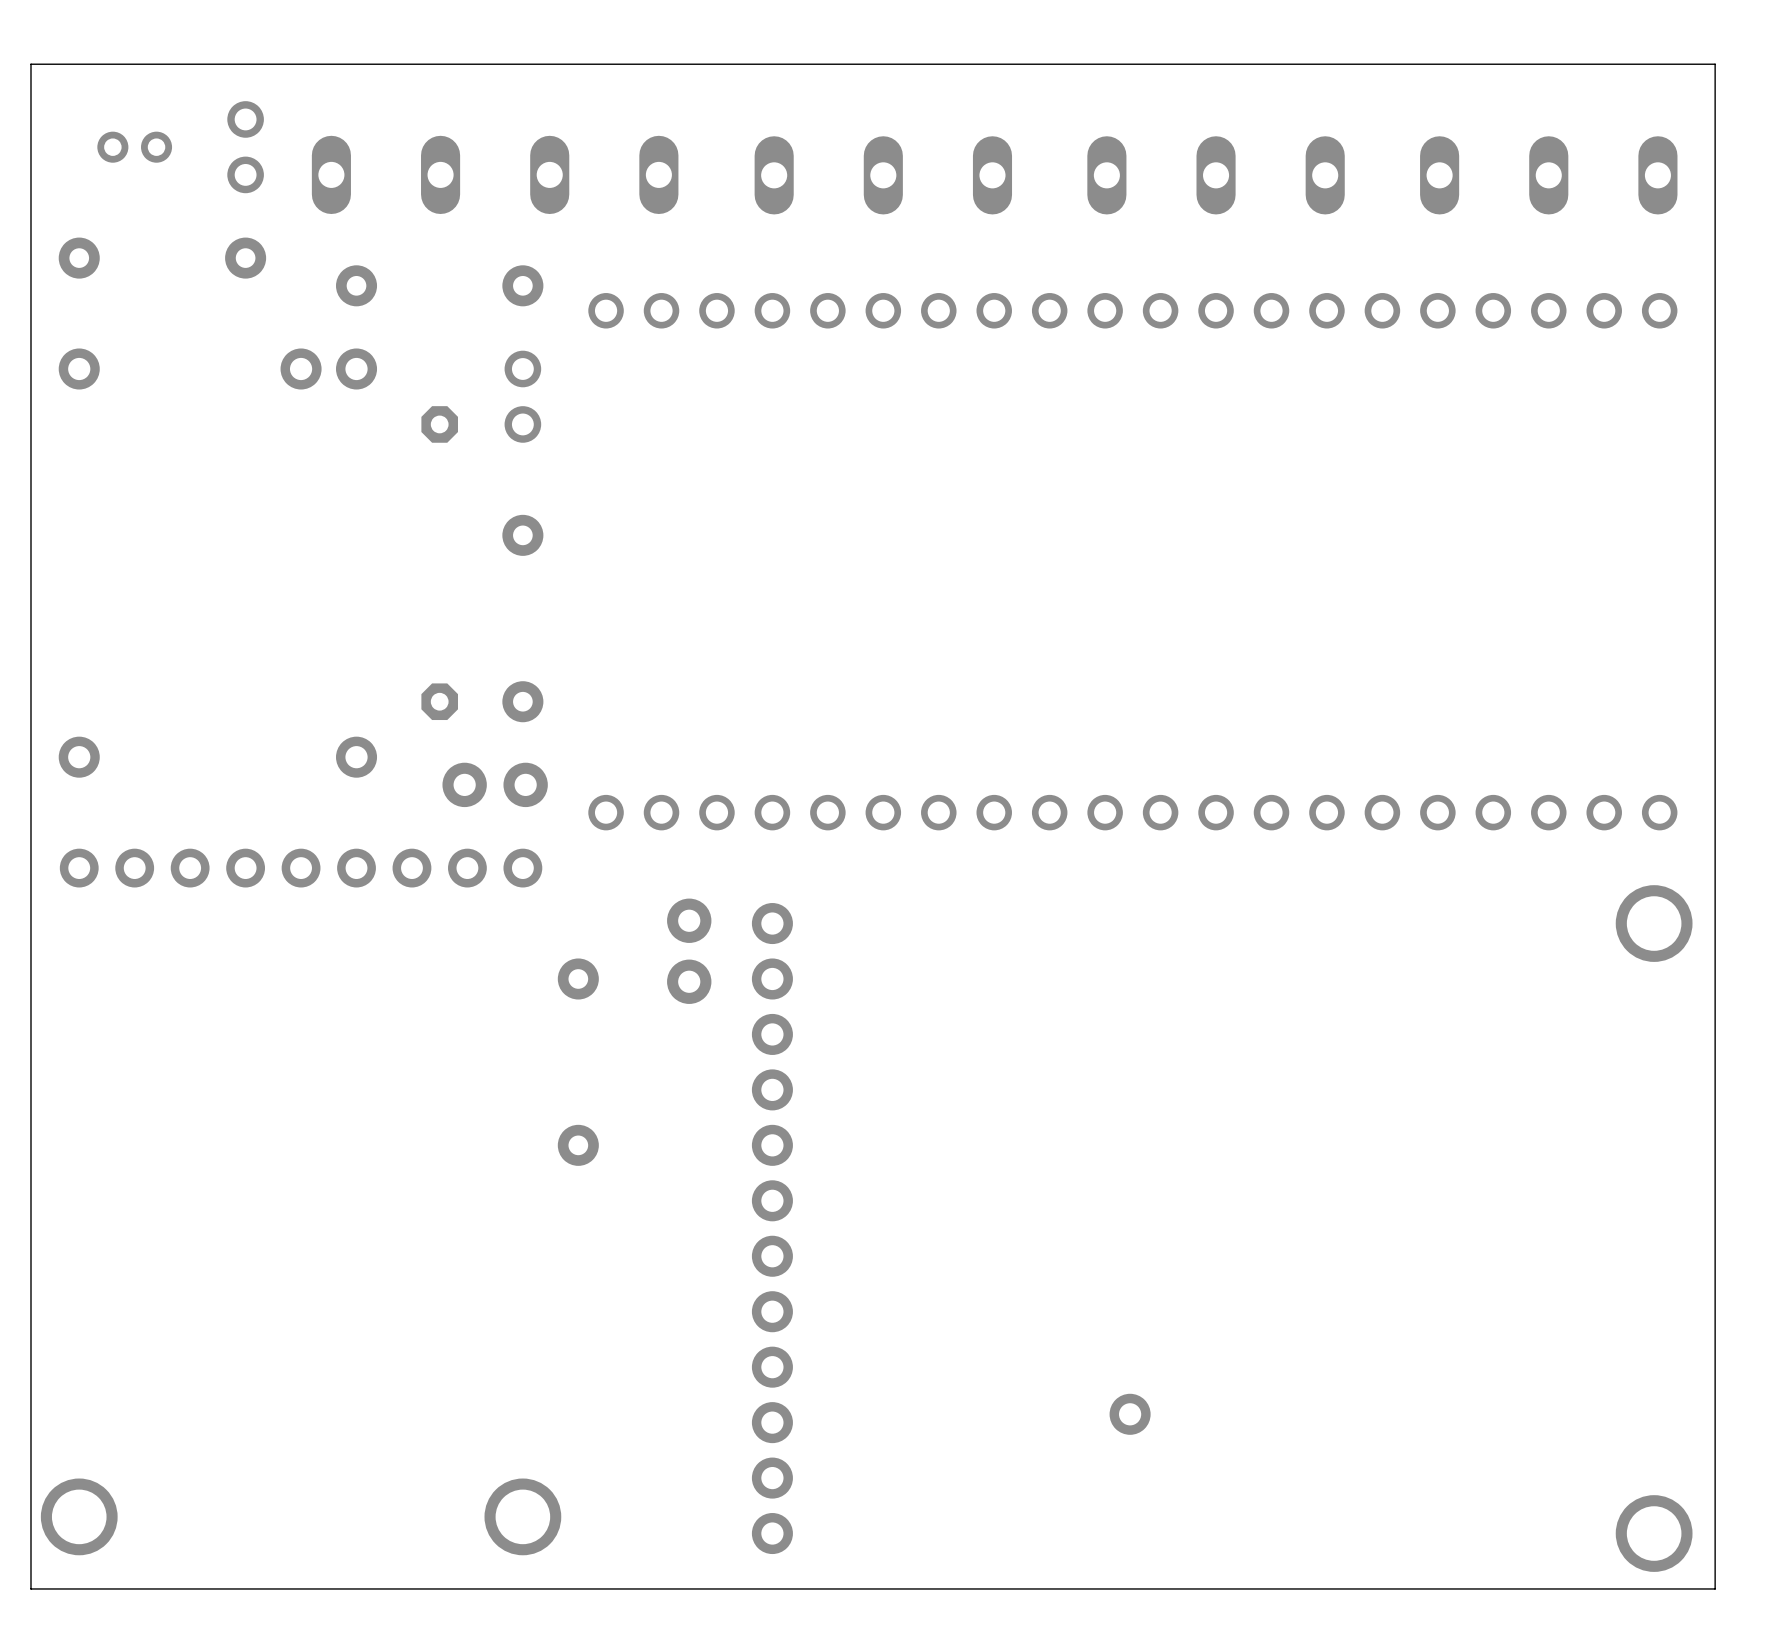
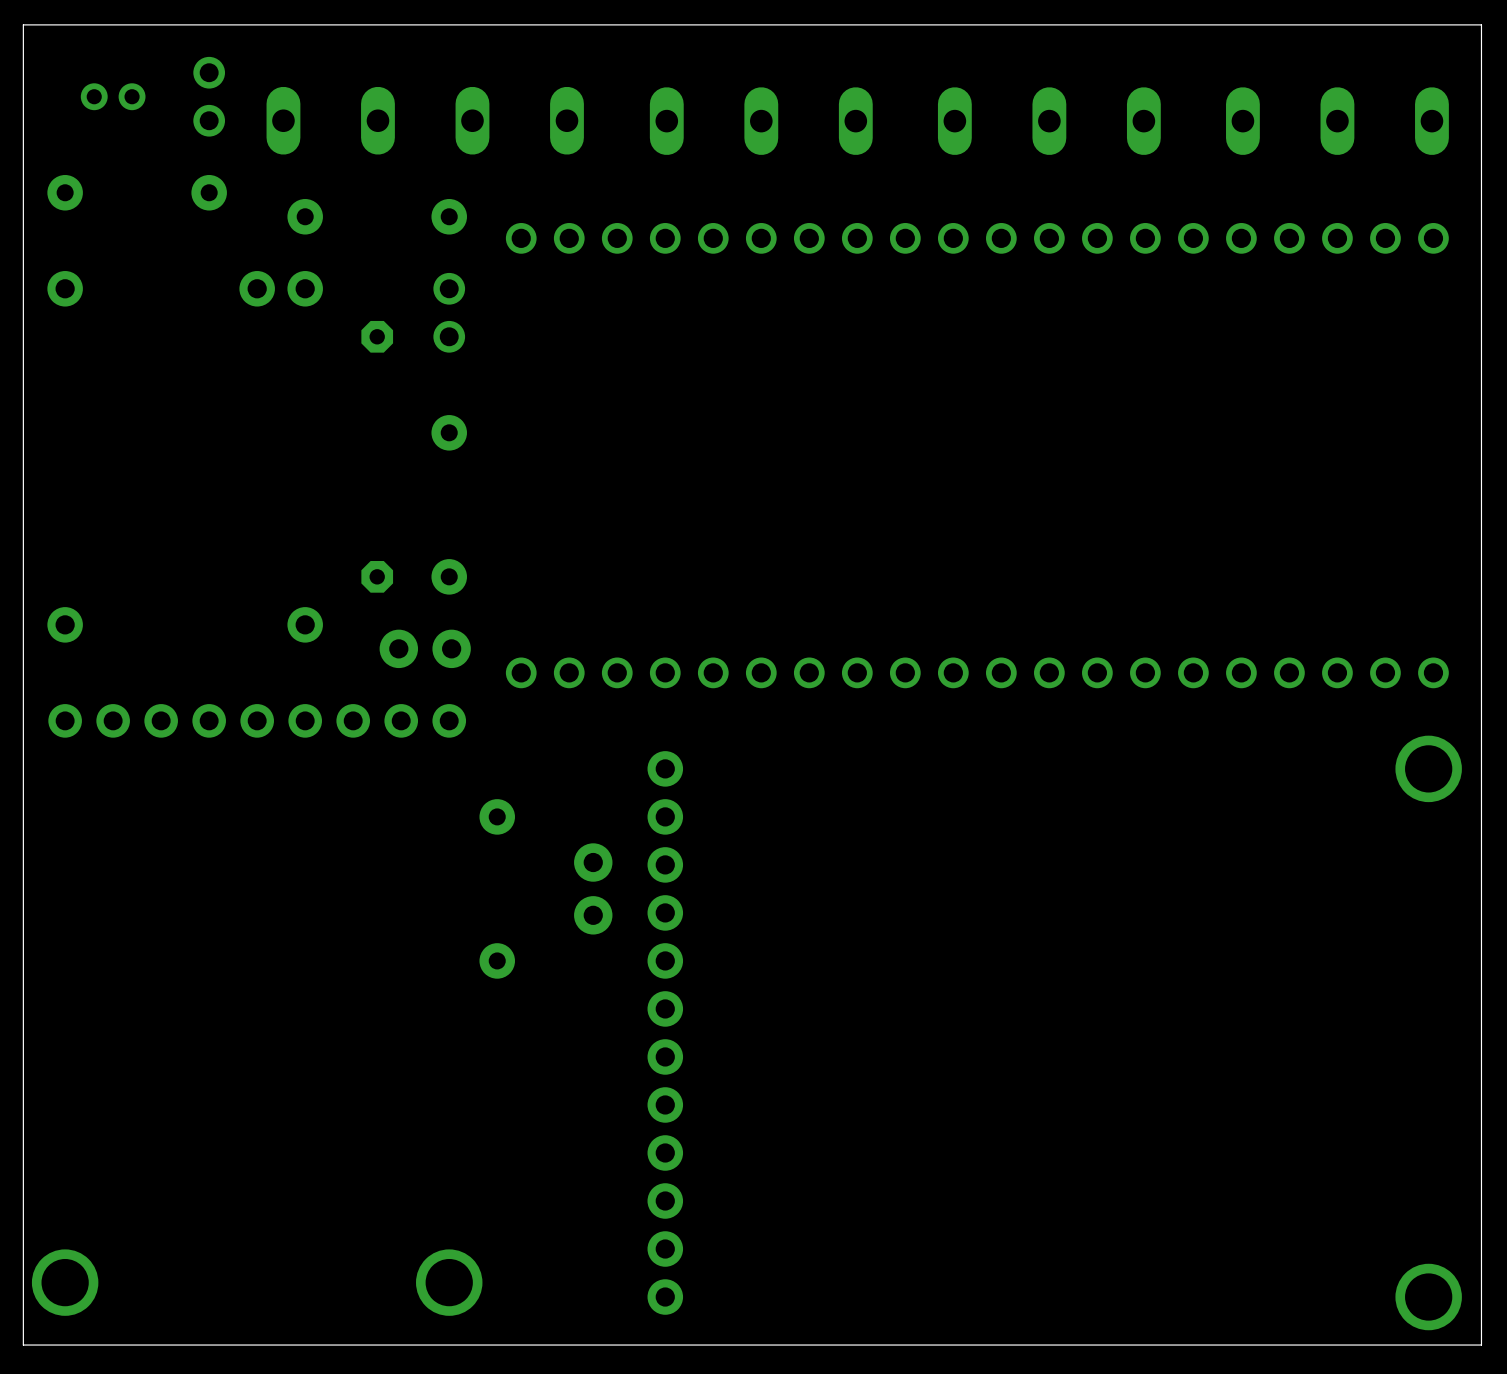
part position: (689, 951) -> (593, 888)
part: (1130, 1414) -> none

